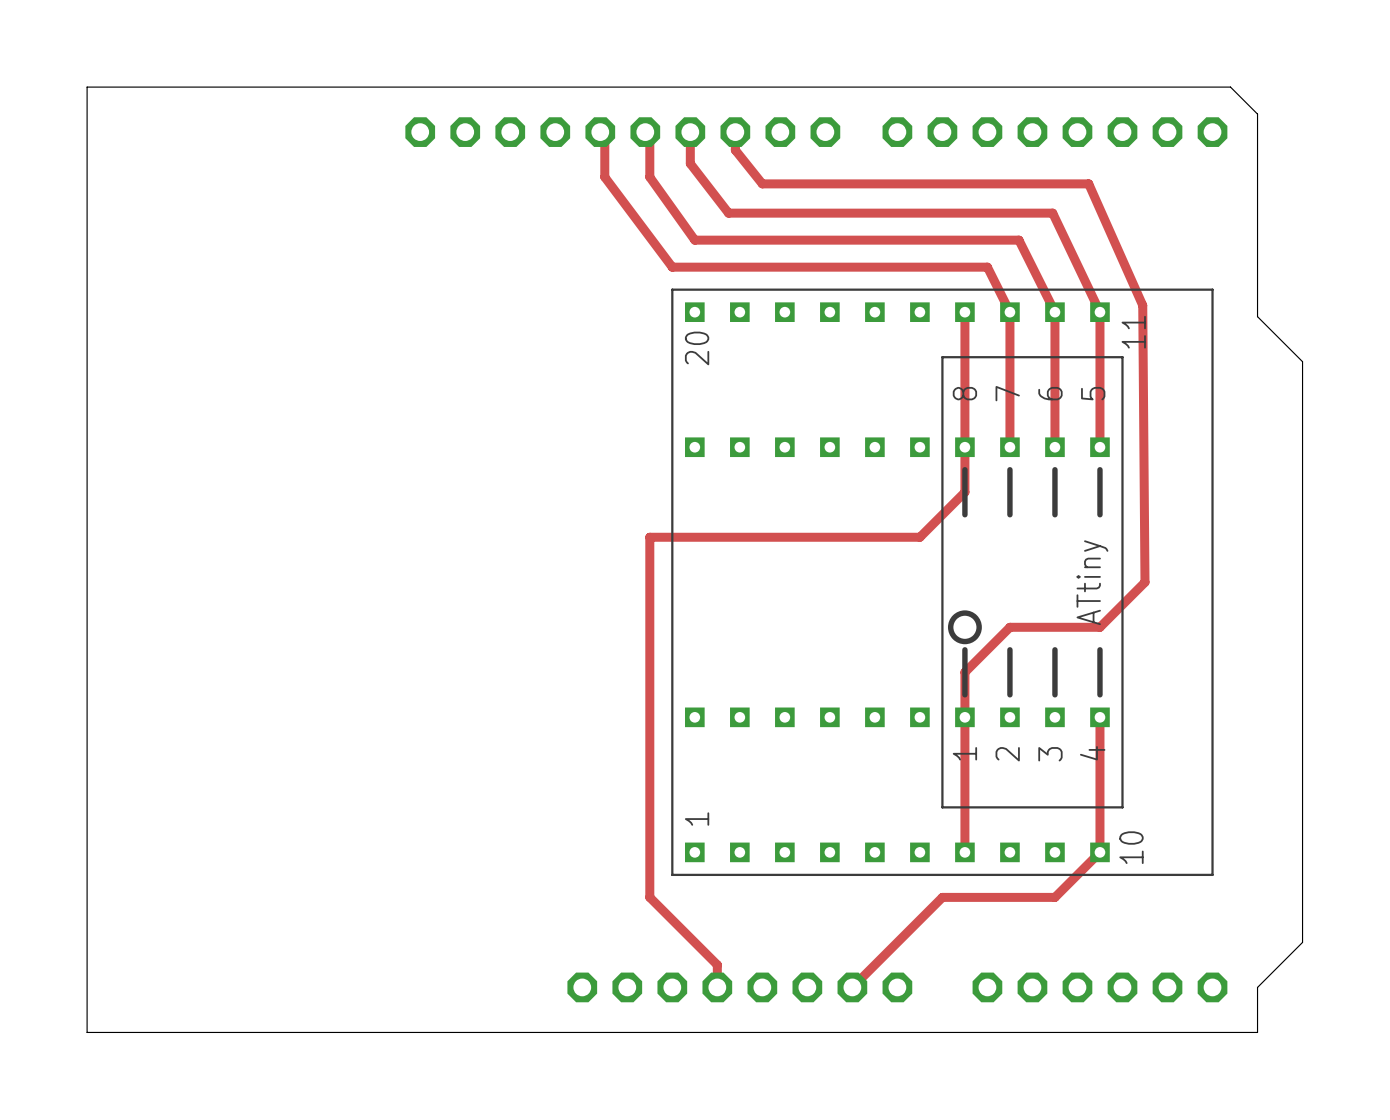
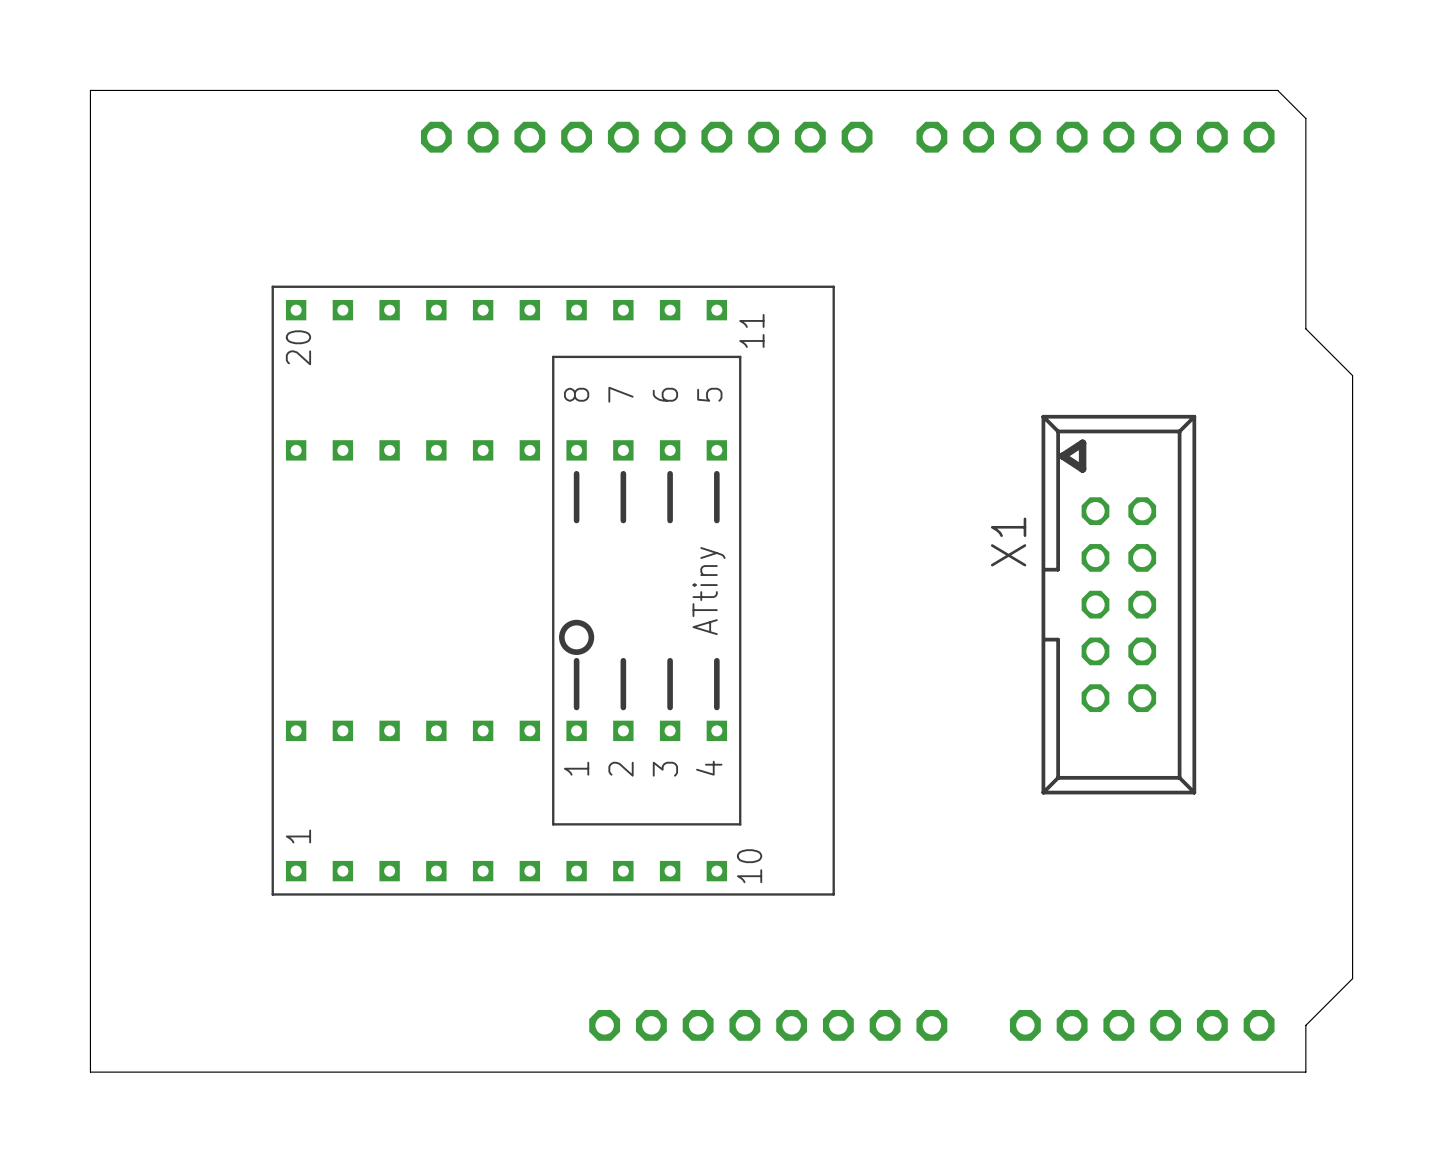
track: (600, 132) (604, 136) (604, 177) (672, 267) (987, 267) (1009, 312) (1009, 447) -> none
track: (645, 132) (649, 136) (649, 177) (694, 240) (1018, 240) (1054, 312) (1054, 447) -> none
track: (690, 132) (690, 163) (728, 213) (1052, 213) (1099, 312) (1099, 447) -> none
track: (735, 132) (735, 150) (762, 183) (1088, 183) (1142, 305) (1144, 582) (1099, 627) (1009, 627) (964, 672) (964, 852) -> none
track: (964, 312) (964, 492) (919, 537) (649, 537) (649, 897) (717, 964) (717, 987) -> none
part position: (942, 582) -> (553, 590)
X1: none -> (1118, 604)
track: (1099, 717) (1099, 852) (1054, 897) (942, 897) (852, 987) -> none

